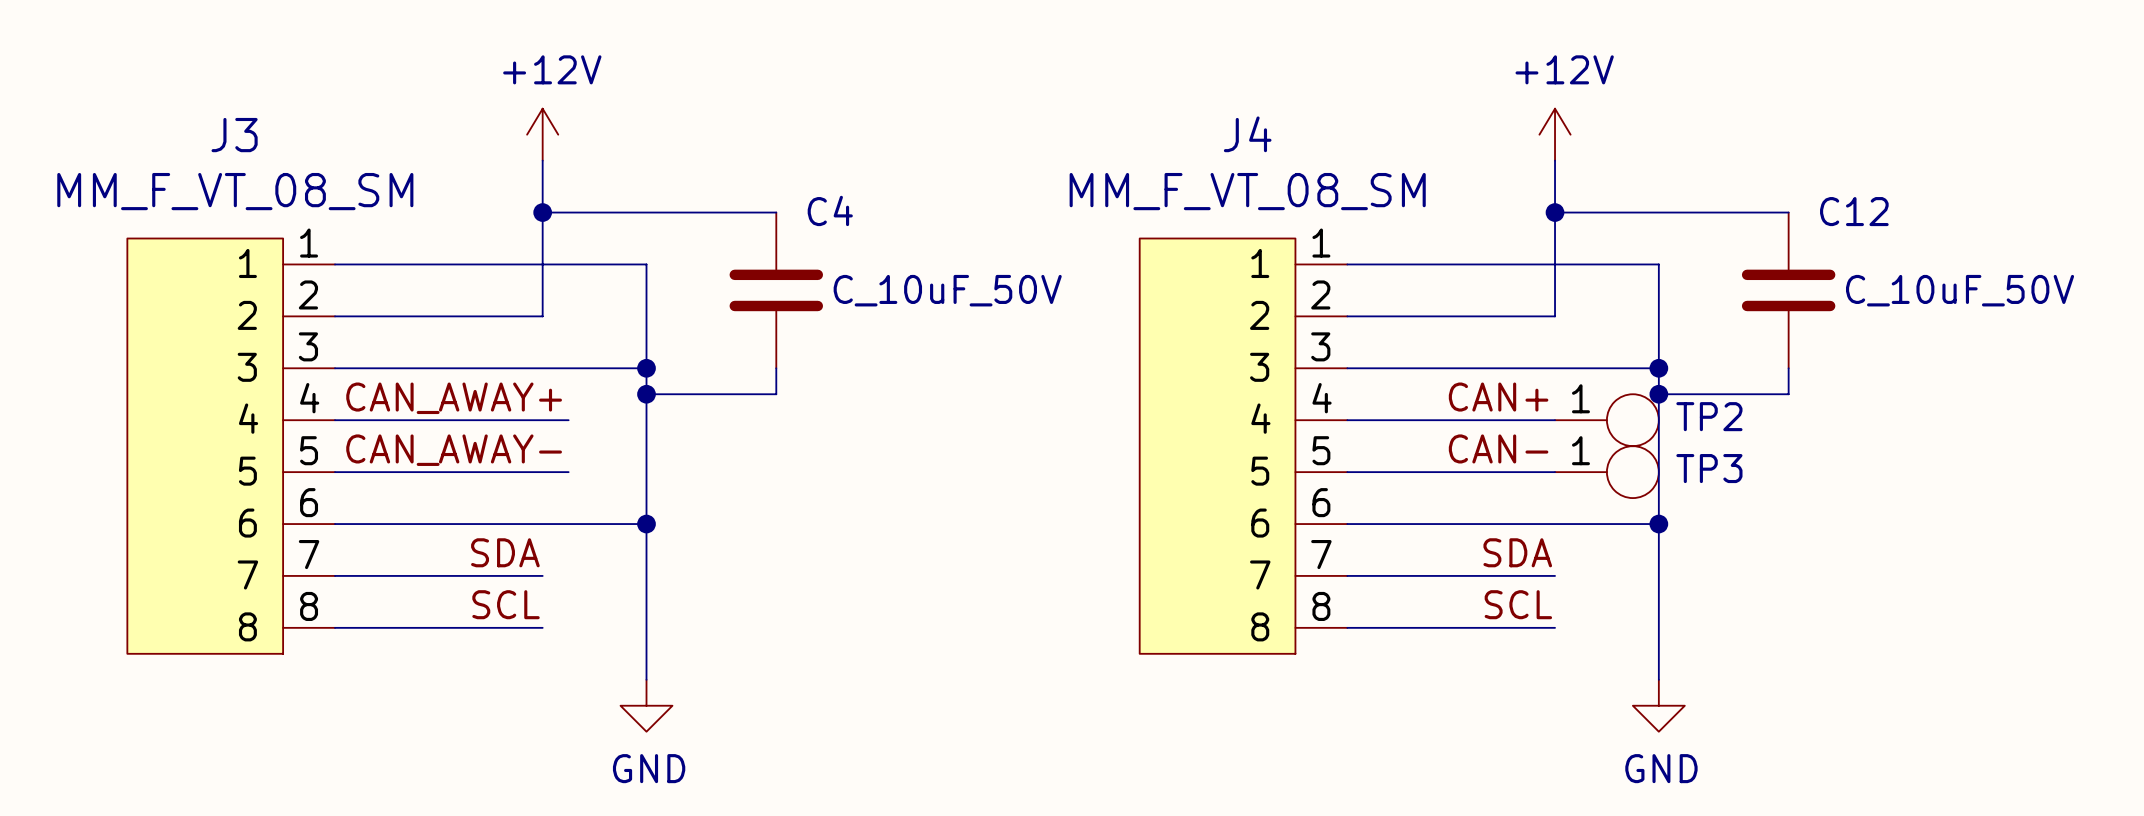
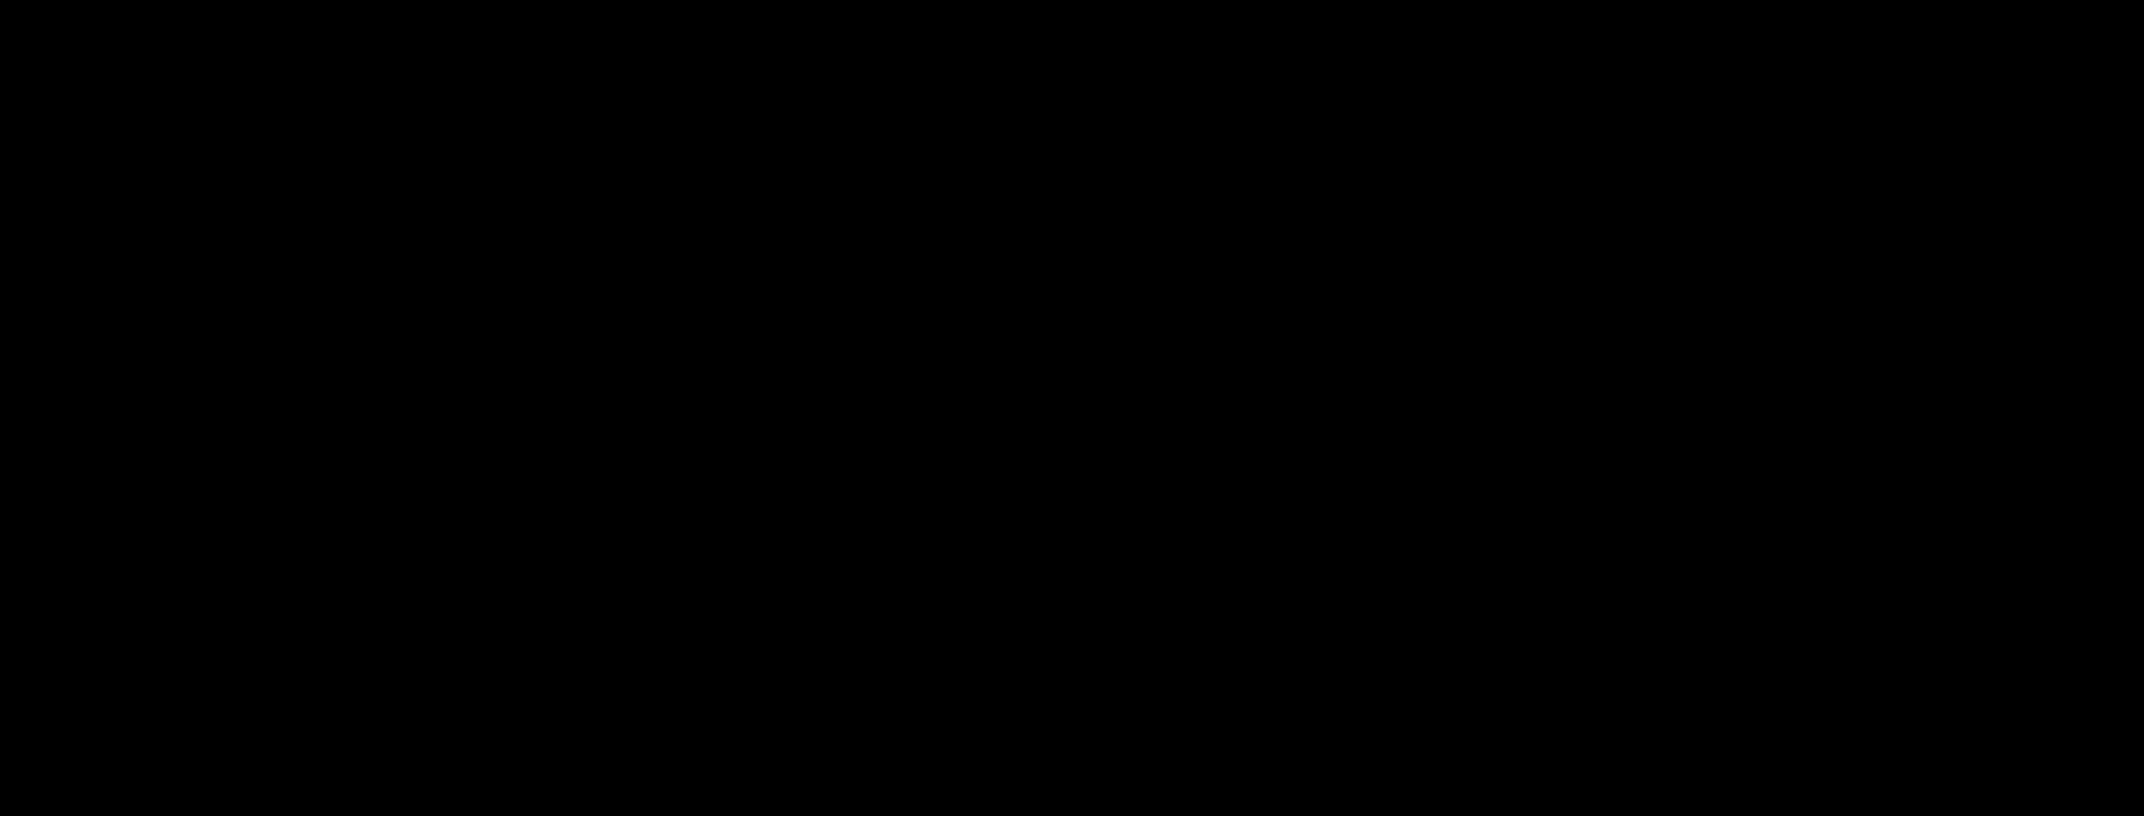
power symbol: +12V (542, 134) -> none
power symbol: +12V (1555, 134) -> none
wire: (542, 160) (542, 316) (335, 316) -> none
wire: (1555, 160) (1555, 316) (1347, 316) -> none
wire: (542, 212) (776, 212) -> none
junction: (542, 212) -> none
wire: (1555, 212) (1788, 212) -> none
junction: (1555, 212) -> none
wire: (335, 264) (646, 264) (646, 679) -> none
wire: (1347, 264) (1658, 264) (1658, 679) -> none
C4: C_10uF_50V (776, 290) -> none
C12: C_10uF_50V (1788, 290) -> none
wire: (335, 368) (646, 368) -> none
junction: (646, 368) -> none
wire: (776, 368) (776, 394) (646, 394) -> none
wire: (1347, 368) (1658, 368) -> none
junction: (1658, 368) -> none
wire: (1788, 368) (1788, 394) (1658, 394) -> none
junction: (646, 394) -> none
junction: (1658, 394) -> none
label: CAN+ (1498, 397) -> none
label: CAN_AWAY+ (454, 398) -> none
wire: (335, 420) (568, 420) -> none
wire: (1347, 420) (1555, 420) -> none
TP2: (1606, 420) -> none
J3: MM_F_VT_08_SM (231, 446) -> none
J4: MM_F_VT_08_SM (1243, 446) -> none
label: CAN- (1498, 448) -> none
label: CAN_AWAY- (454, 450) -> none
wire: (335, 472) (568, 472) -> none
wire: (1347, 472) (1555, 472) -> none
TP3: (1606, 472) -> none
wire: (335, 524) (646, 524) -> none
junction: (646, 524) -> none
wire: (1347, 524) (1658, 524) -> none
junction: (1658, 524) -> none
label: SDA (505, 552) -> none
label: SDA (1517, 552) -> none
wire: (335, 575) (542, 575) -> none
wire: (1347, 575) (1555, 575) -> none
label: SCL (506, 604) -> none
label: SCL (1518, 604) -> none
wire: (335, 627) (542, 627) -> none
wire: (1347, 627) (1555, 627) -> none
power symbol: GND (646, 705) -> none
power symbol: GND (1658, 705) -> none

